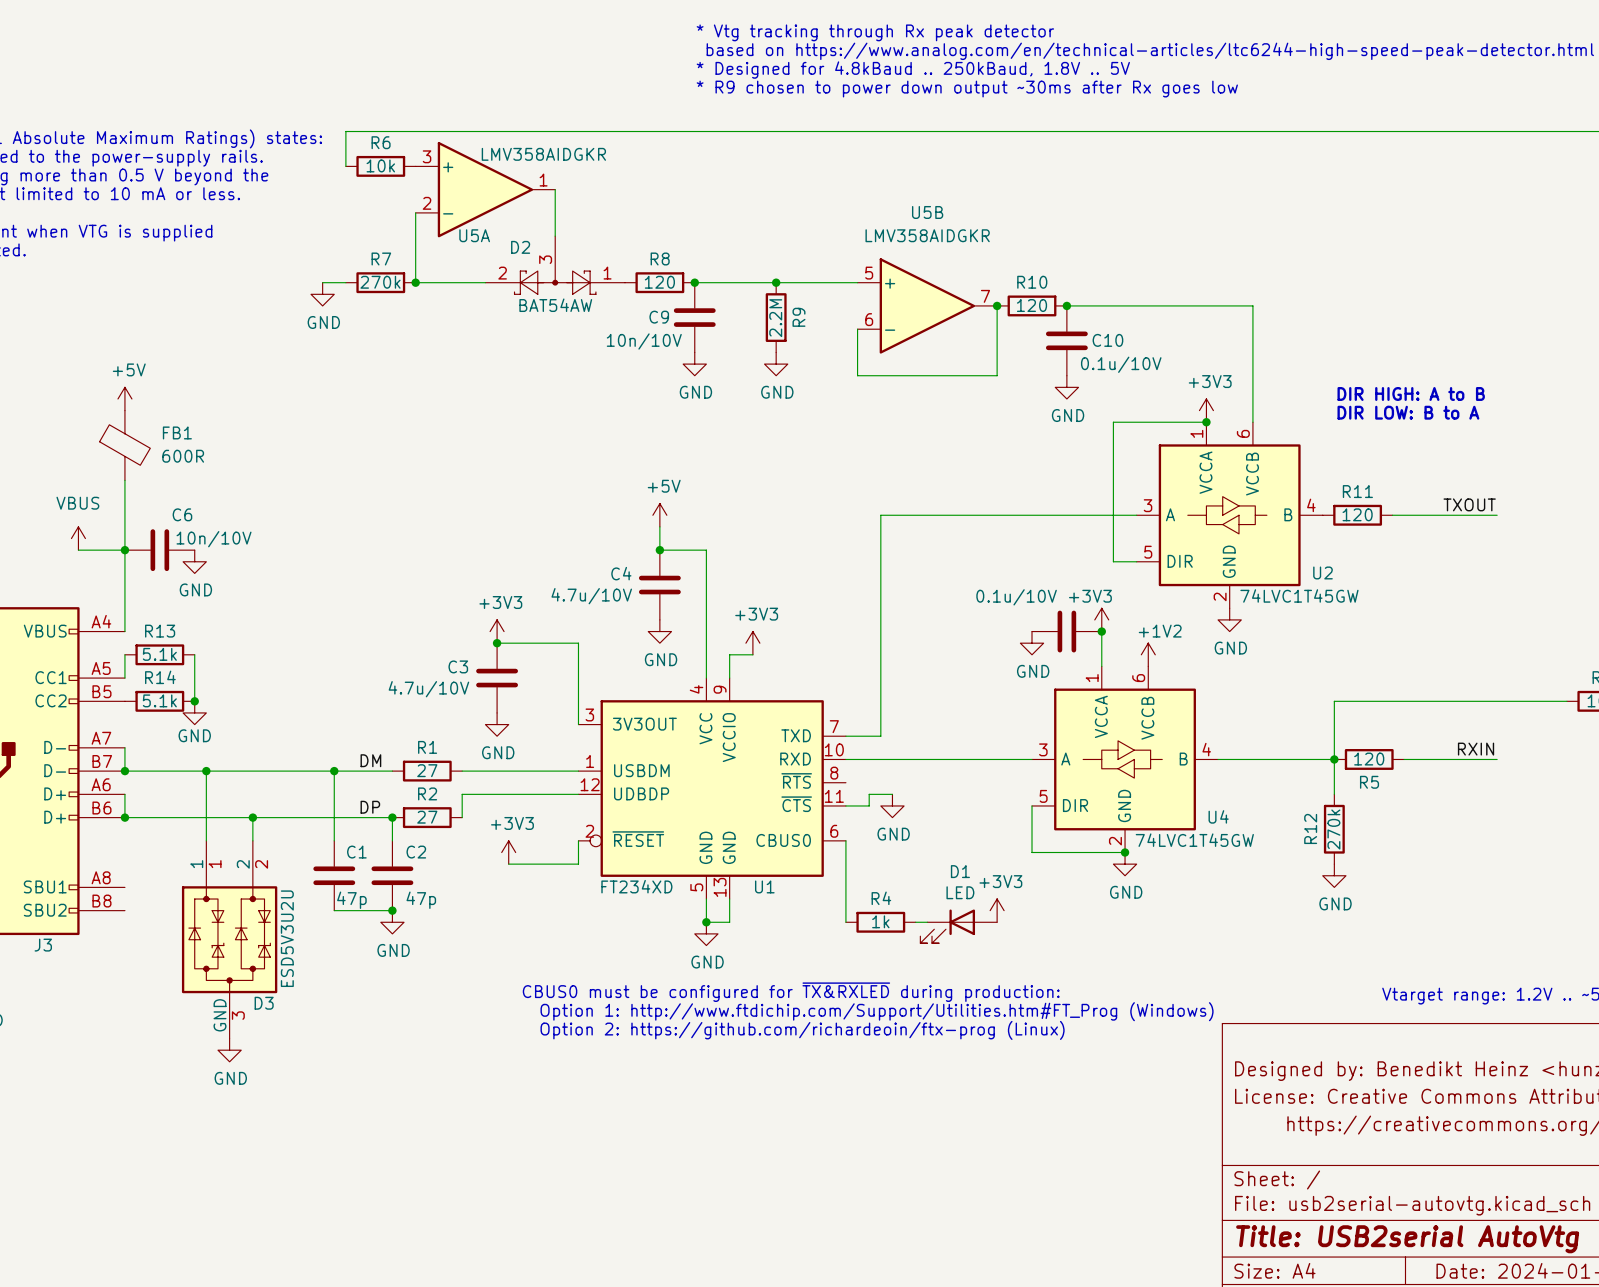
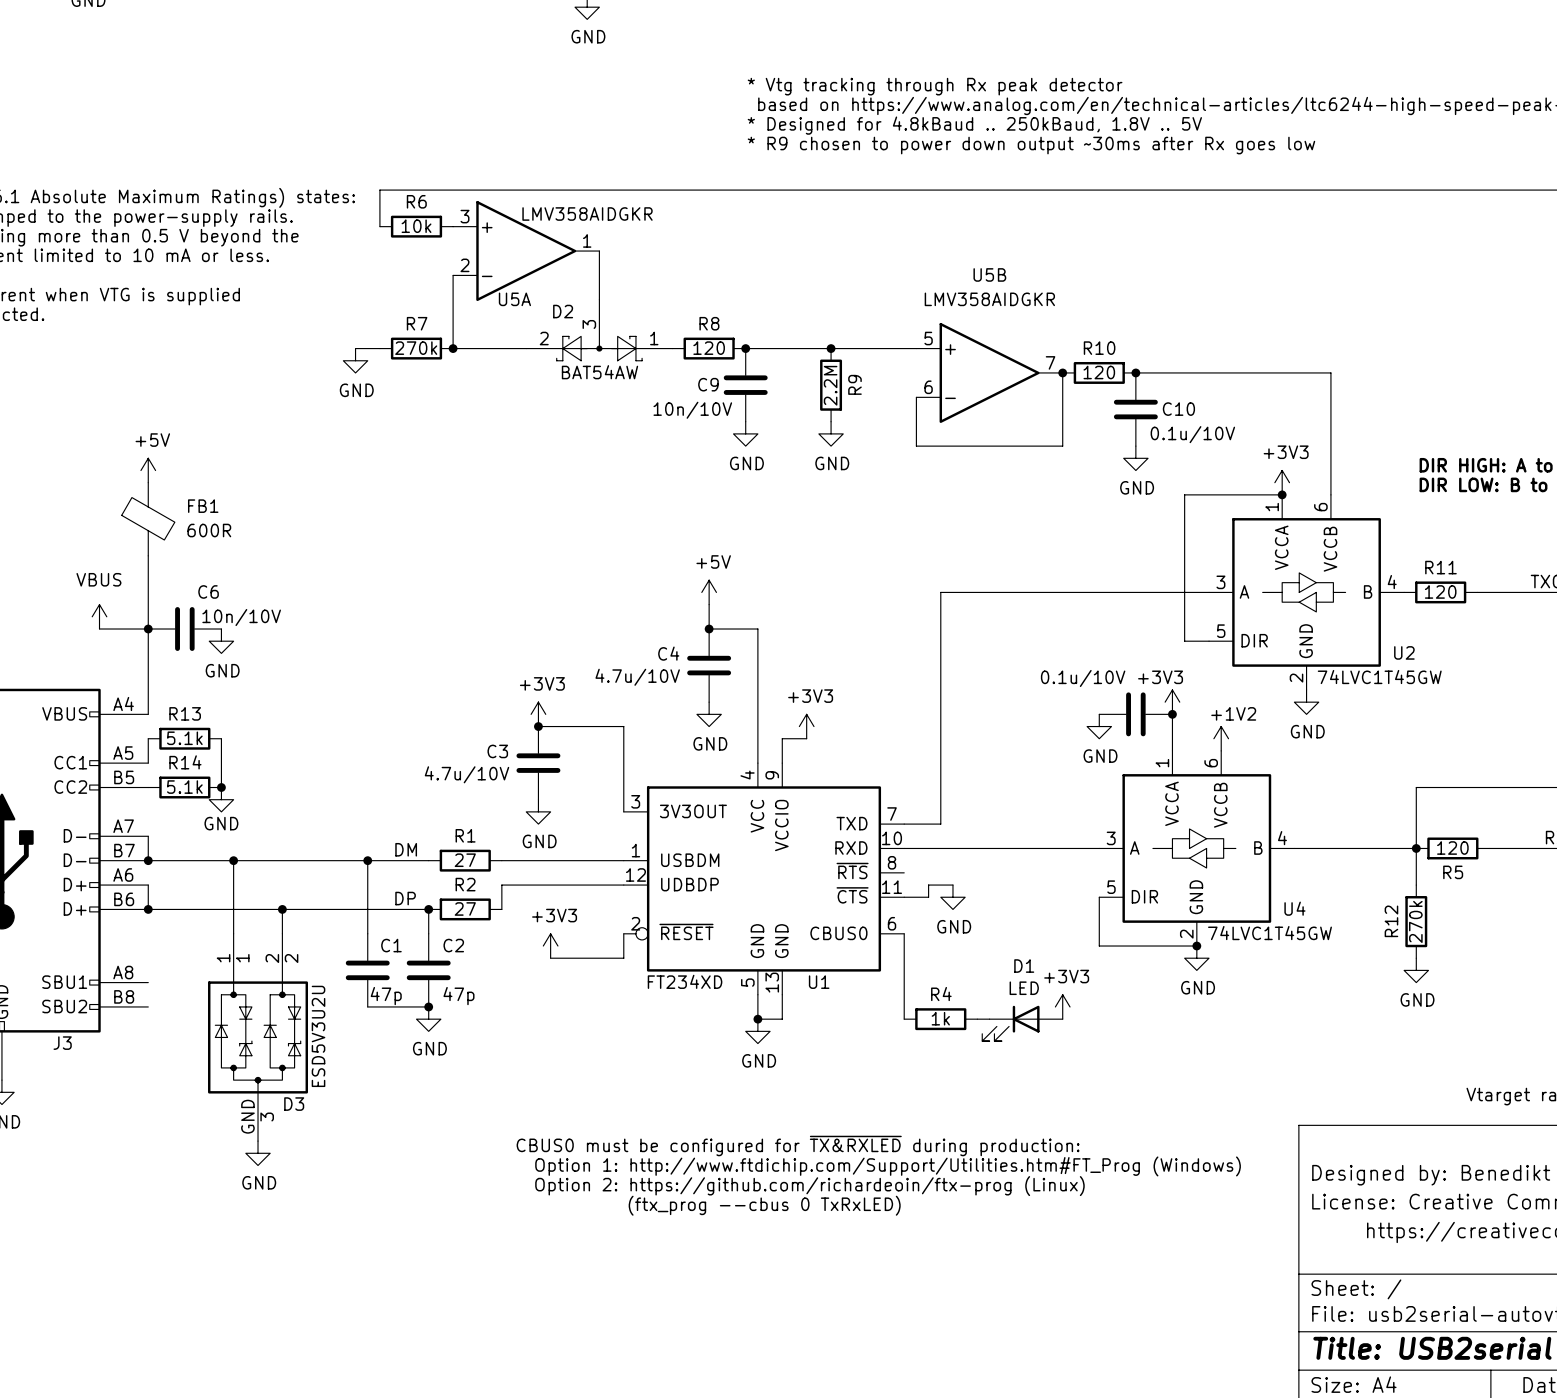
text position: CBUS0 must be configured for ~{TX&RXLED} during production: (791, 992) -> CBUS0 must be configured for ~{TX&RXLED} during production: (798, 1146)
text position: Option 1: http://www.ftdichip.com/Support/Utilities.htm#FT_Prog (Windows) (877, 1011) -> Option 1: http://www.ftdichip.com/Support/Utilities.htm#FT_Prog (Windows) (888, 1166)
text position: Option 2: https://github.com/richardeoin/ftx-prog (Linux) (802, 1030) -> Option 2: https://github.com/richardeoin/ftx-prog (Linux) (809, 1186)
text: none -> (ftx_prog --cbus 0 TxRxLED) (764, 1205)

